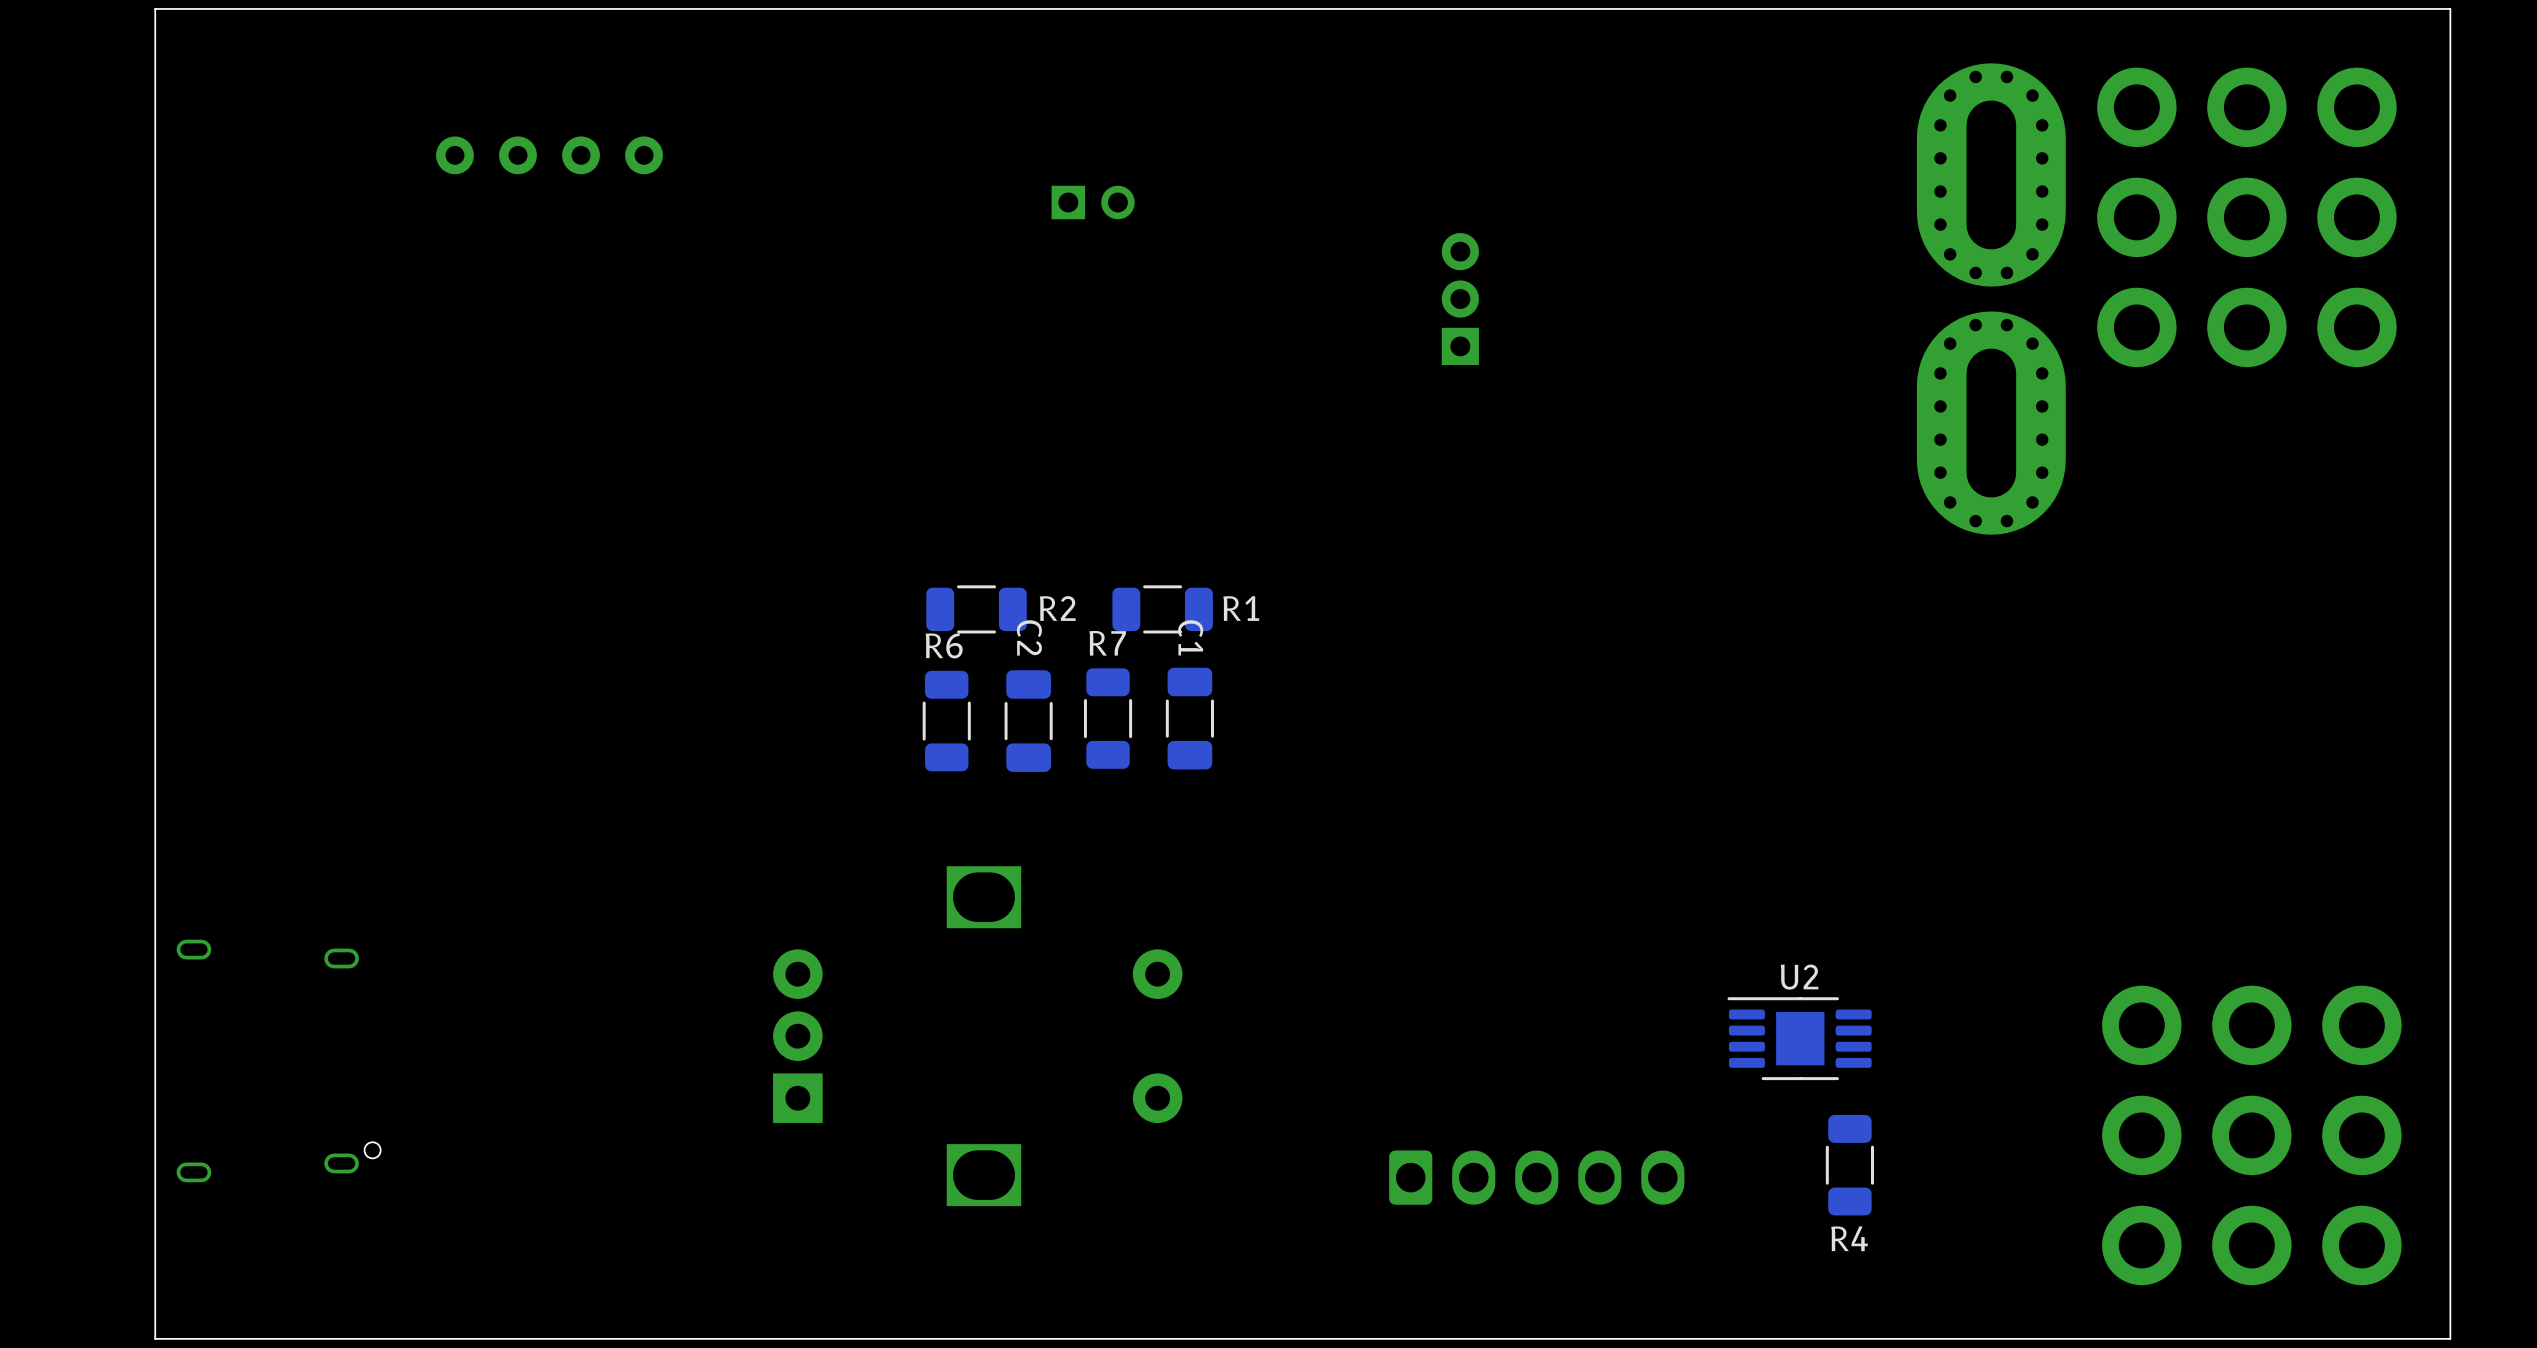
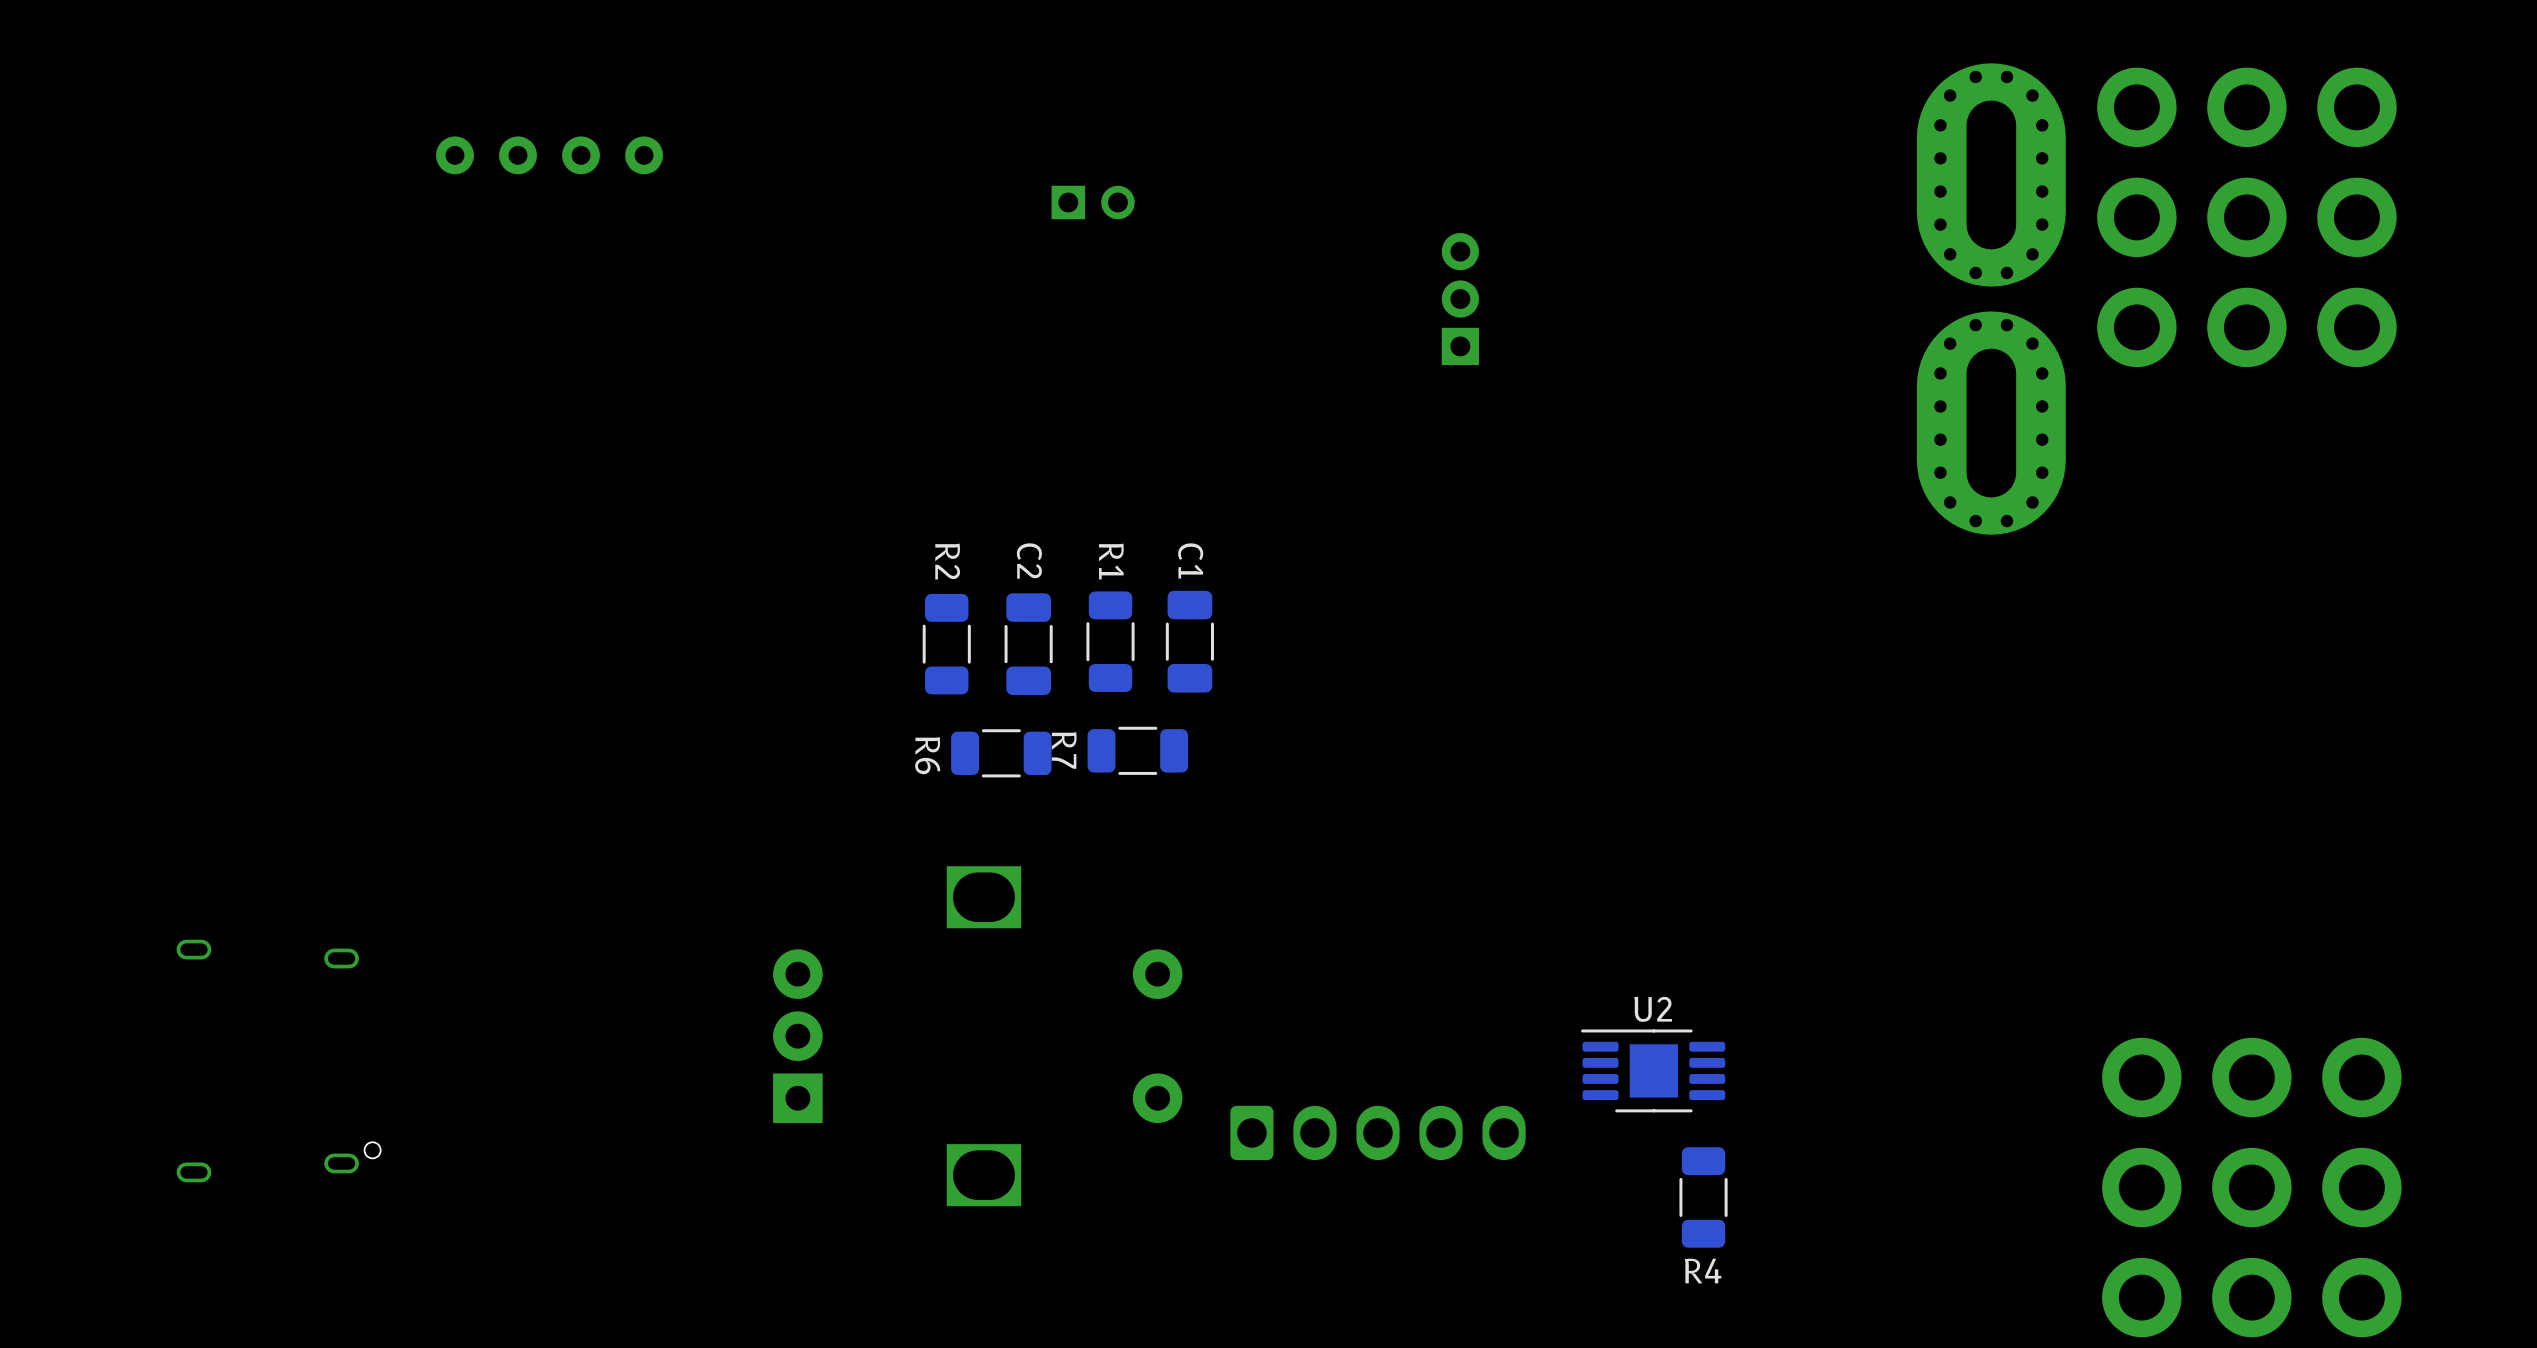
board edge: (2450, 8) (155, 8) (155, 1338) (2450, 1338) (2450, 8) -> none
R2 name position: R2 (1057, 608) -> R2 (947, 561)
R1 name position: R1 (1241, 608) -> R1 (1111, 561)
R2 rotation: 0° (976, 609) -> 90° clockwise (946, 644)
R1 rotation: 0° (1162, 609) -> 90° clockwise (1110, 641)
R1 position: (1162, 609) -> (1110, 641)
R7 name position: R7 (1107, 643) -> R7 (1064, 750)
R6 name position: R6 (944, 645) -> R6 (927, 755)
R7 rotation: 0° (1108, 718) -> 90° clockwise (1137, 750)
C1 position: (1189, 718) -> (1189, 641)
R6 rotation: 0° (946, 721) -> 90° clockwise (1001, 753)
R6 position: (946, 721) -> (1001, 753)
C2 position: (1028, 721) -> (1028, 644)
U2 position: (1799, 1038) -> (1653, 1070)
part position: (2251, 1135) -> (2251, 1187)
R4 position: (1849, 1165) -> (1703, 1197)
part position: (1536, 1177) -> (1377, 1132)

